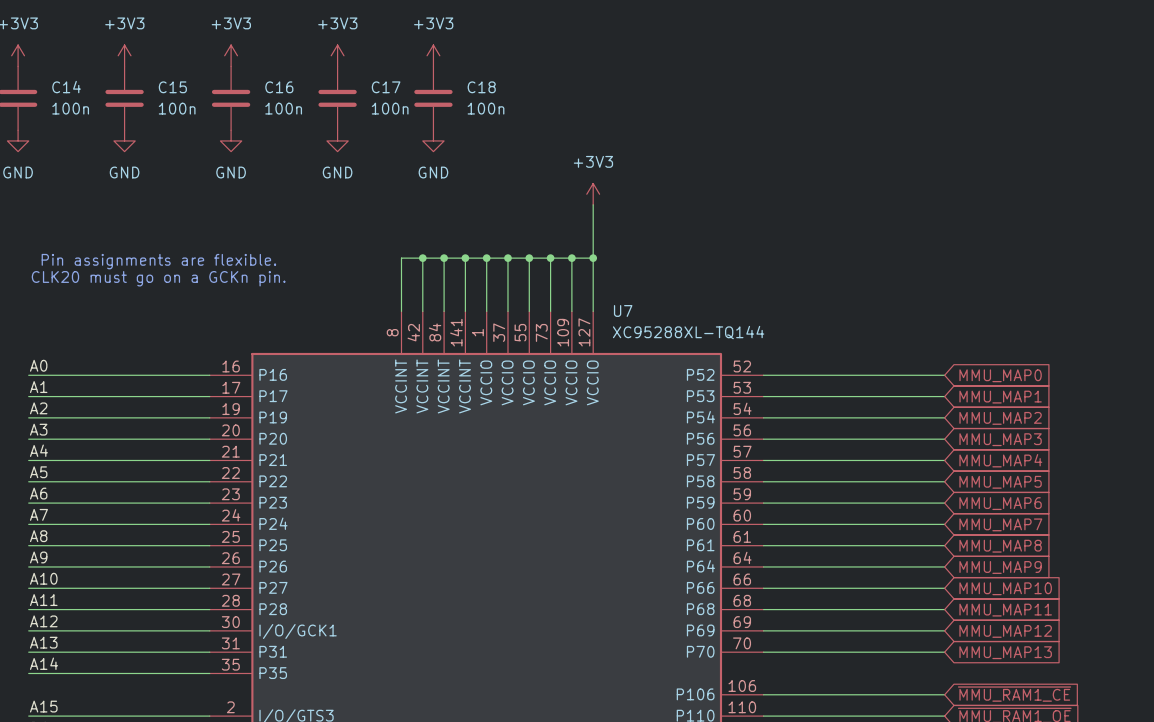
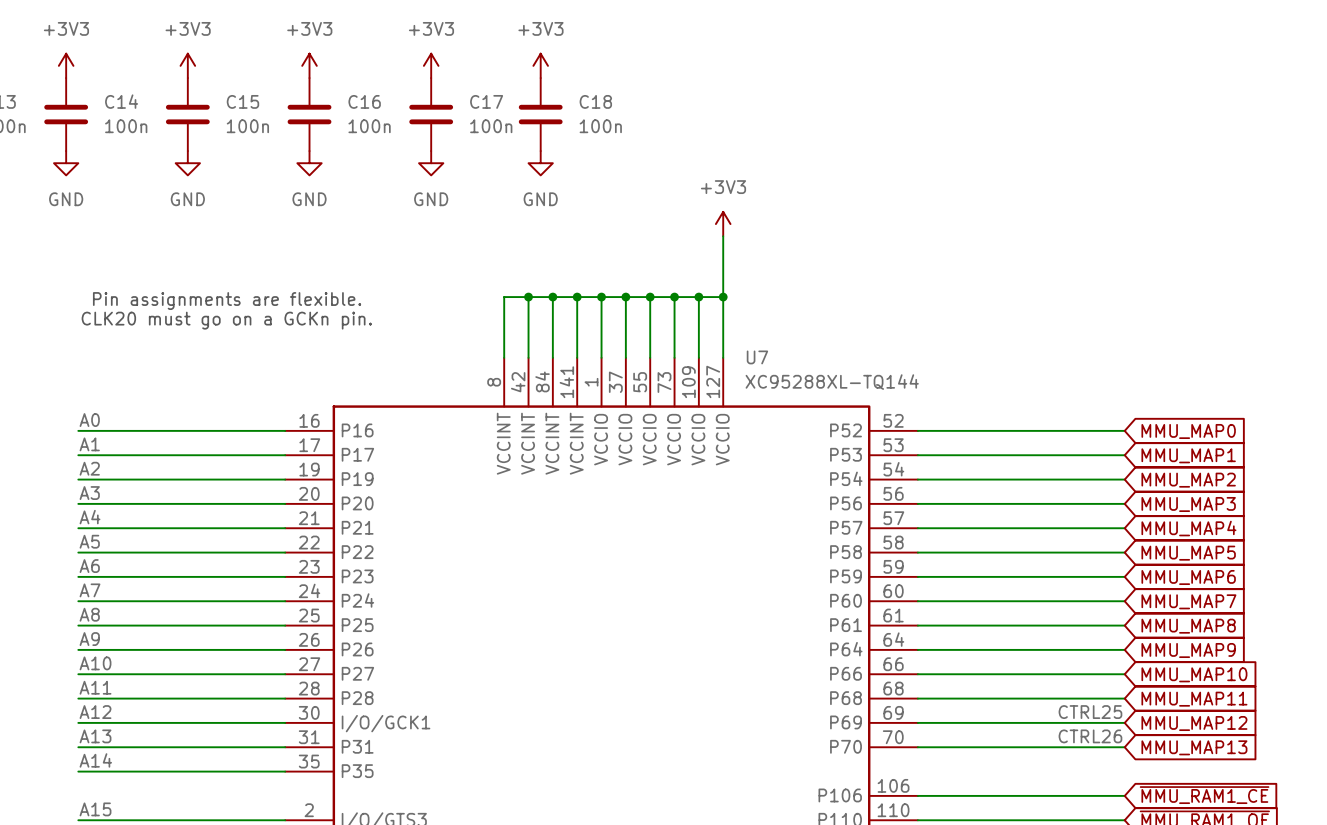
label: none -> CTRL25 (1090, 712)
label: none -> CTRL26 (1090, 736)

